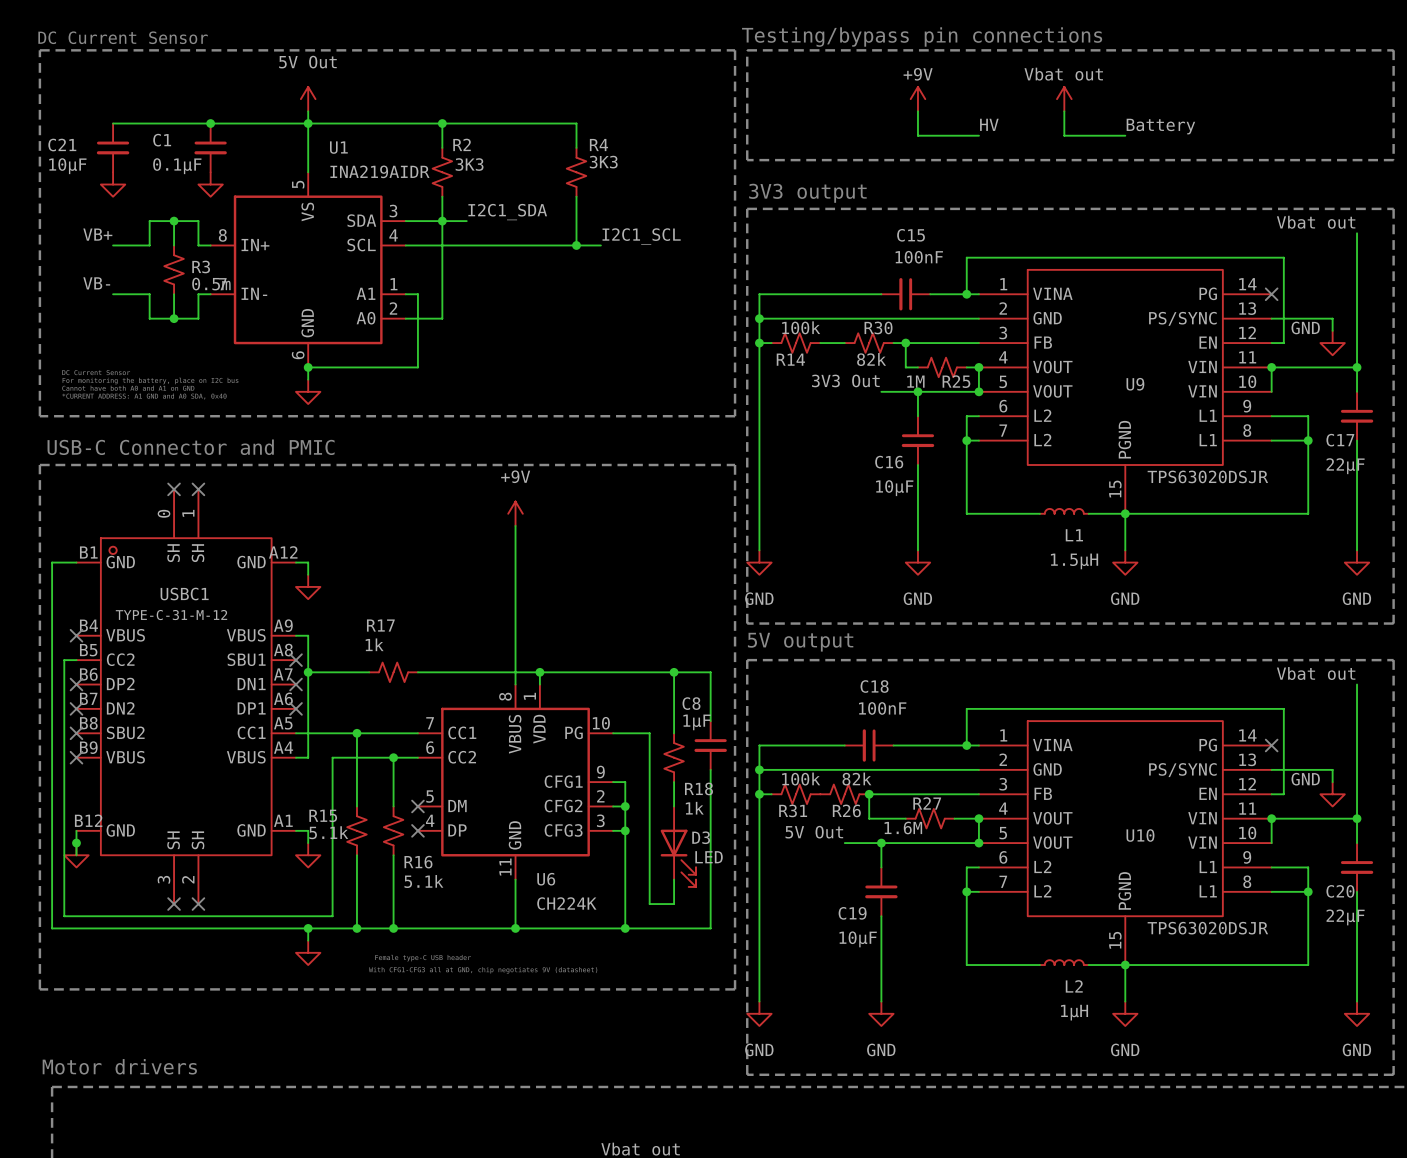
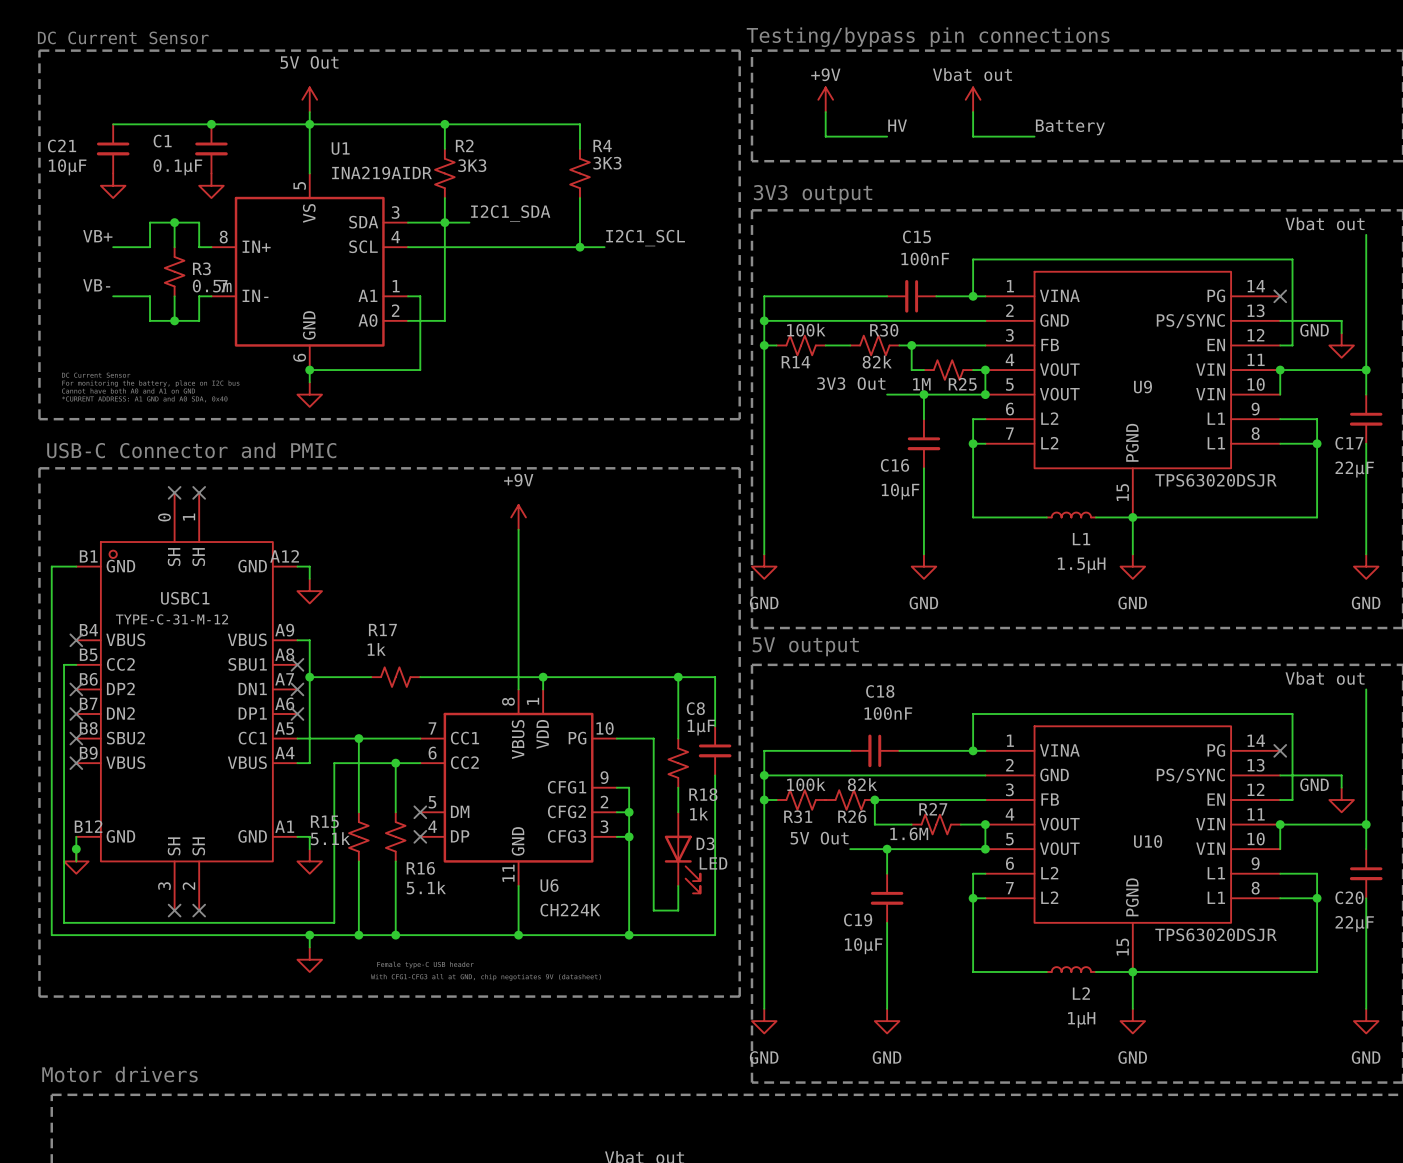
power symbol position: +9V (917, 99) -> +9V (825, 99)
power symbol position: Vbat out (1064, 99) -> Vbat out (973, 99)
wire: none -> (825, 112) (825, 136) (887, 136)
wire: (917, 111) (917, 135) (966, 135) -> (973, 112) (973, 136)
wire: (1064, 111) (1064, 135) (1125, 135) -> none
label position: HV (989, 124) -> HV (897, 125)
label position: Battery (1160, 126) -> Battery (1070, 127)
wire: none -> (985, 136) (1034, 136)

